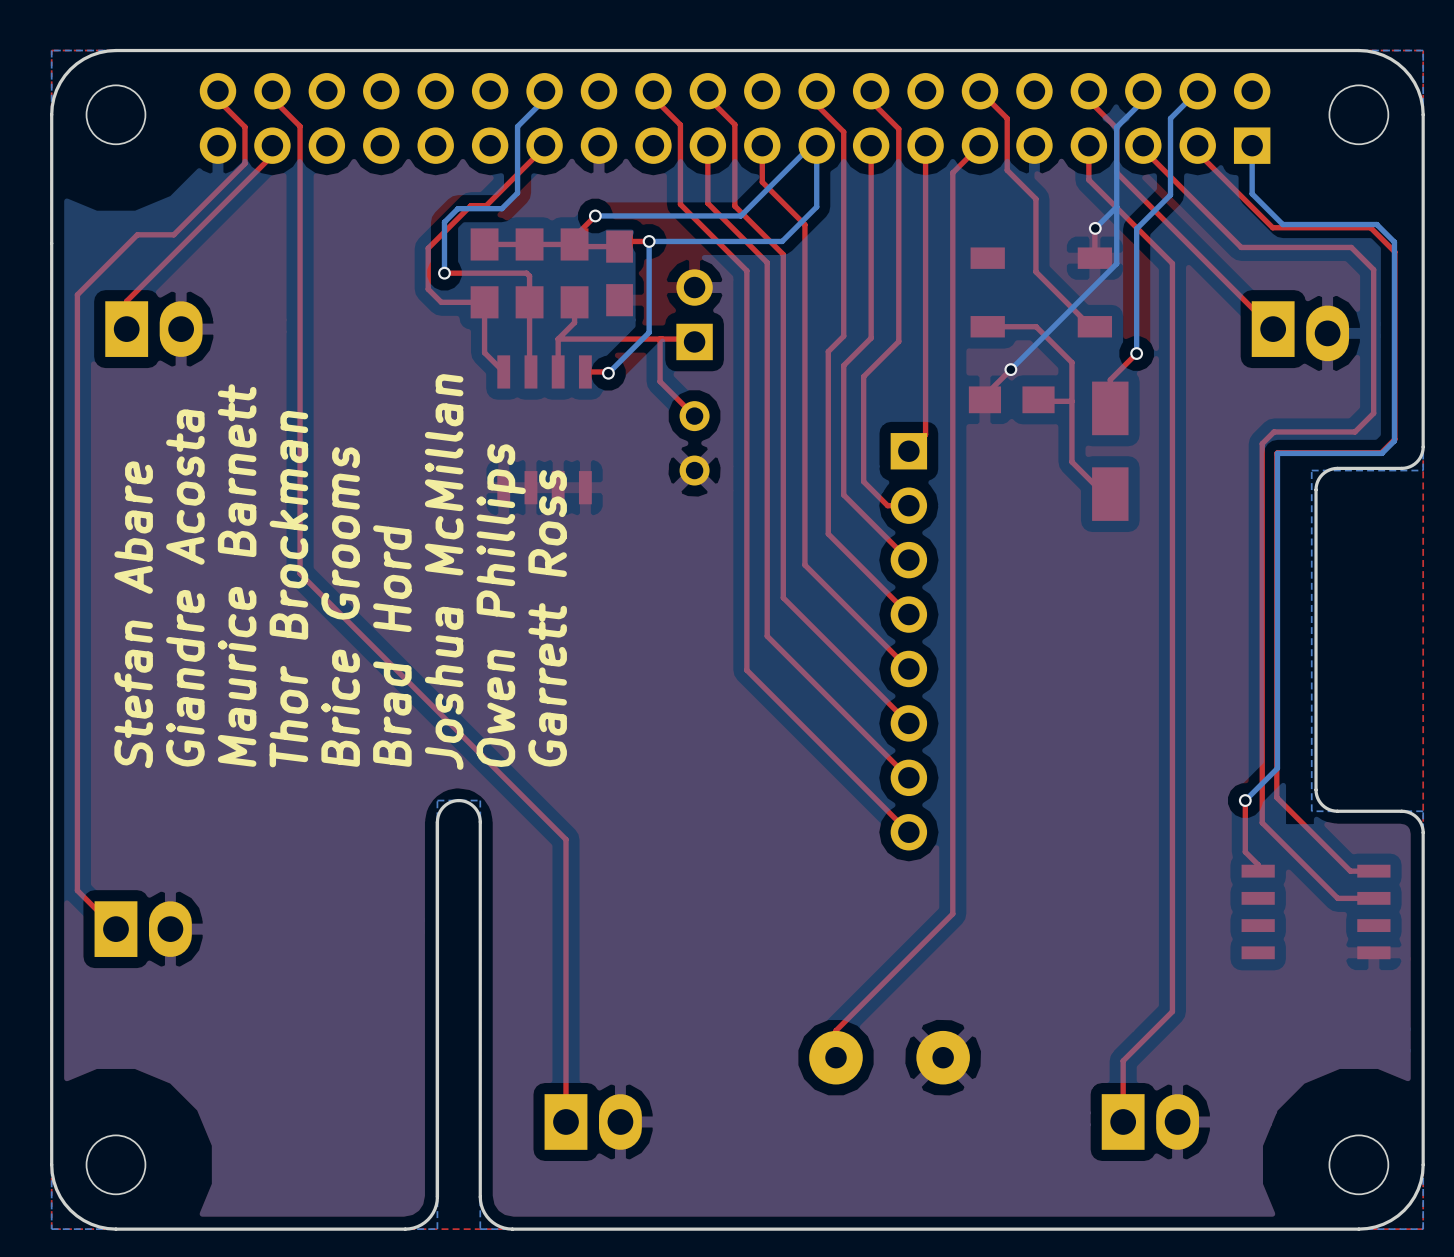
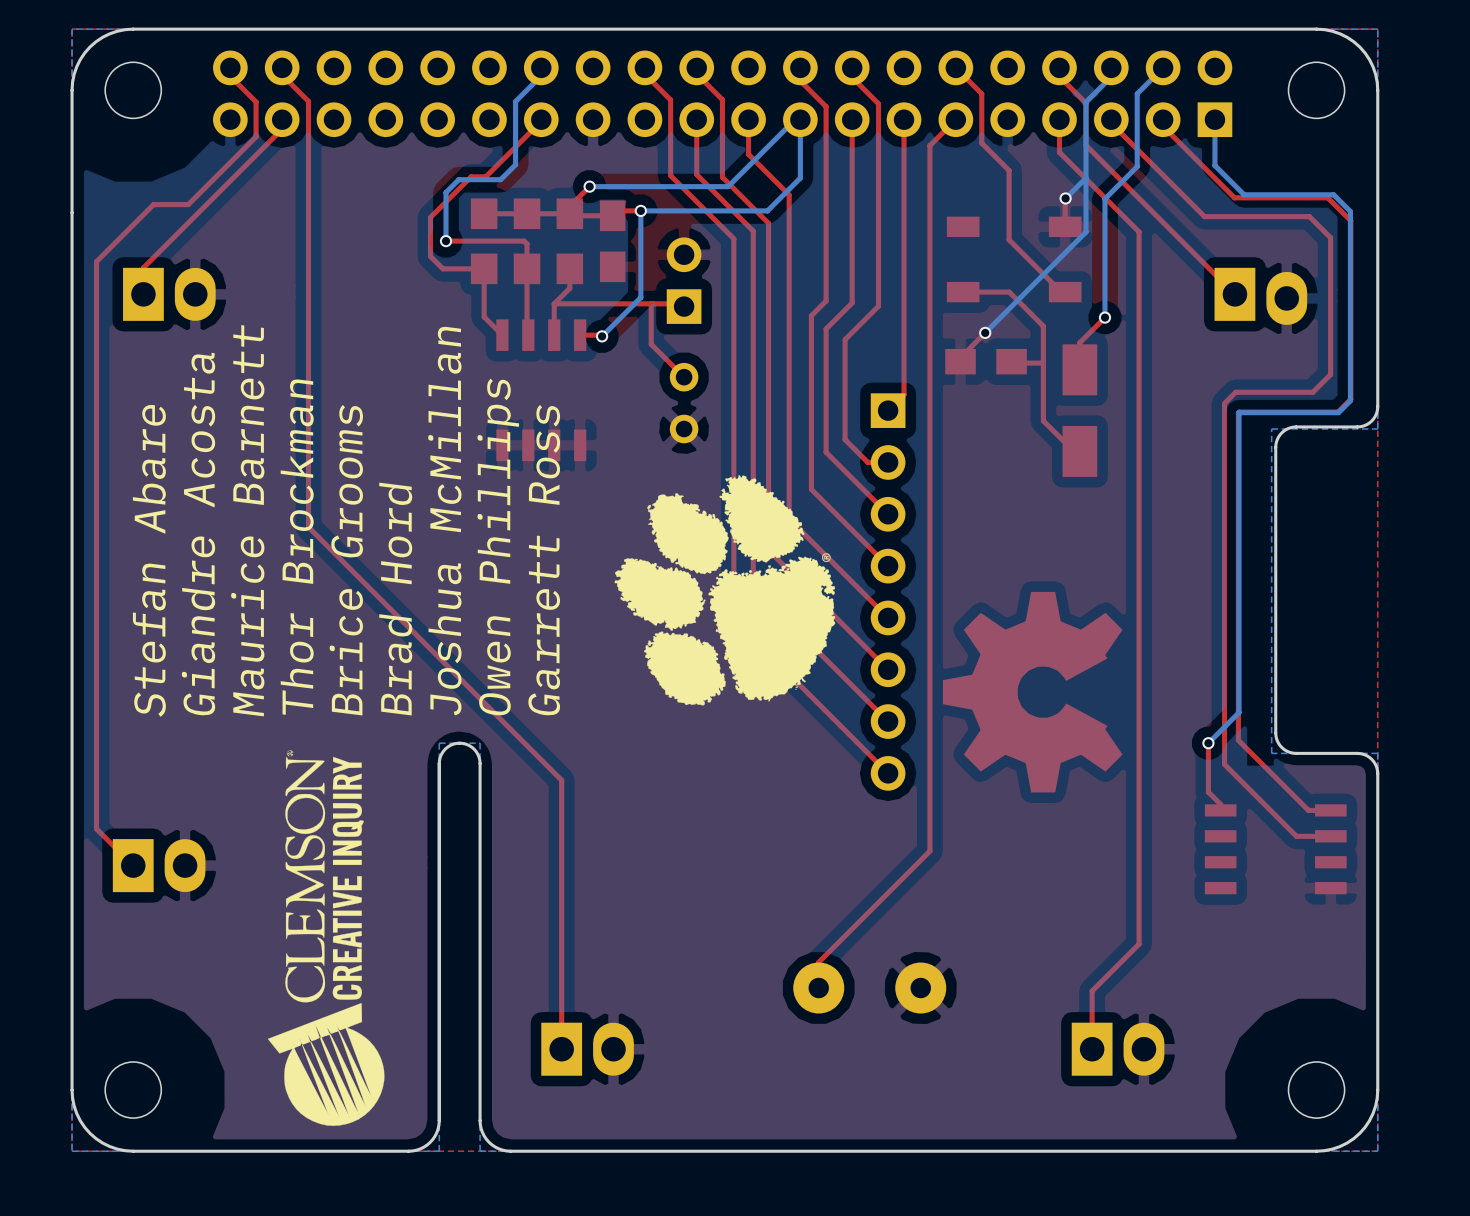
drawing: none -> [614, 475, 836, 706]
part: none -> (1032, 692)
drawing: none -> [267, 750, 385, 1126]

